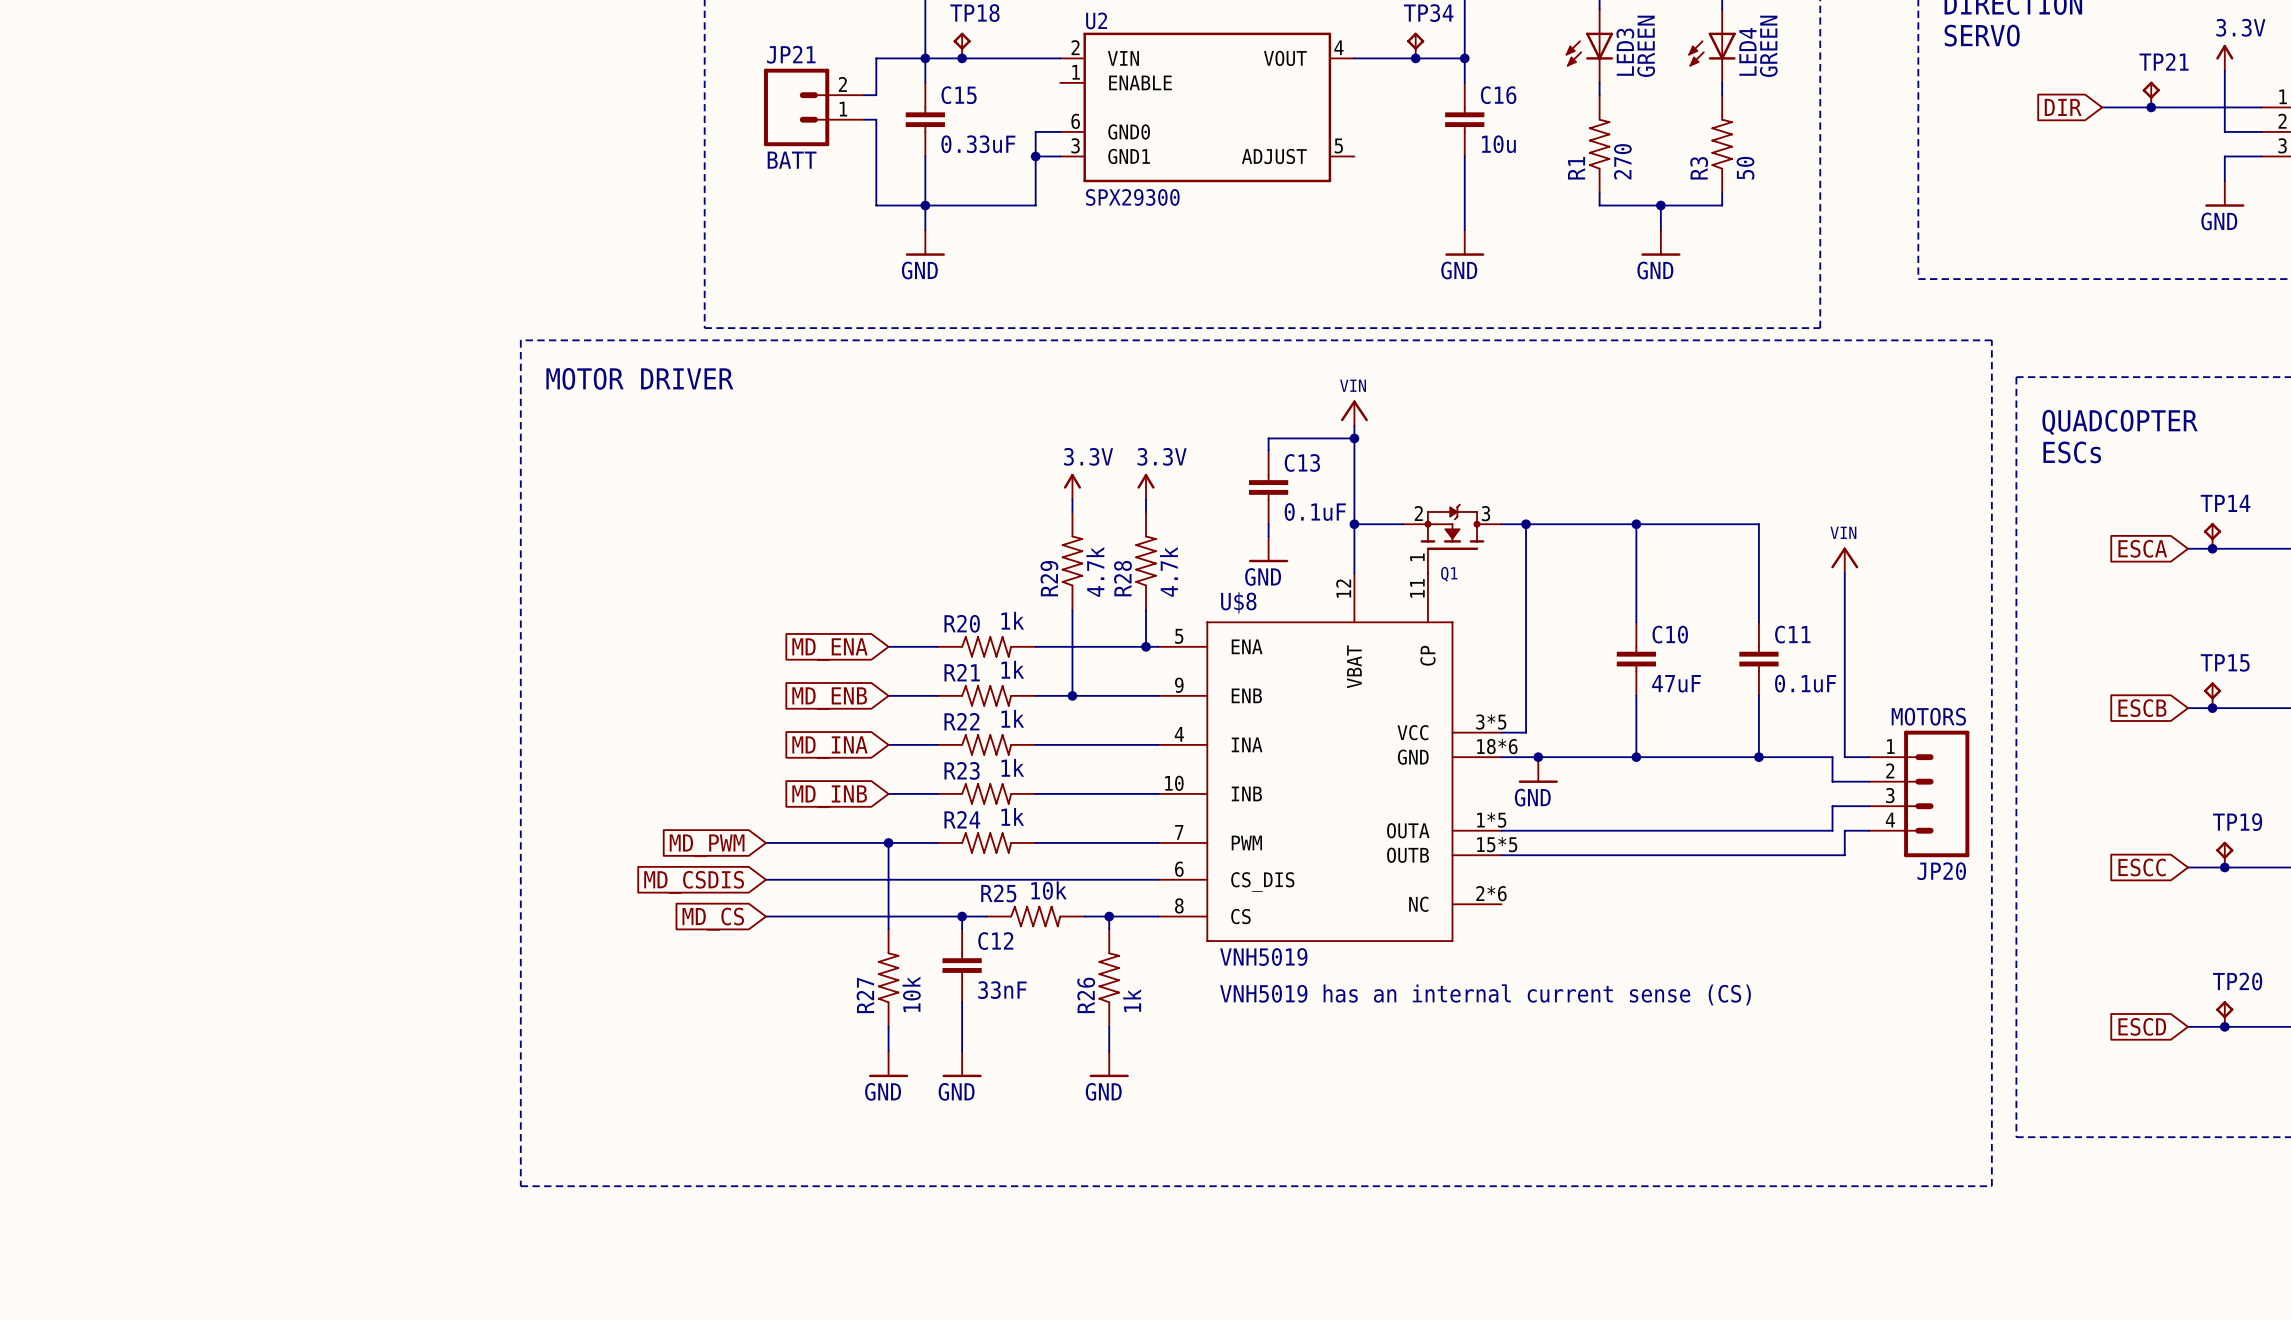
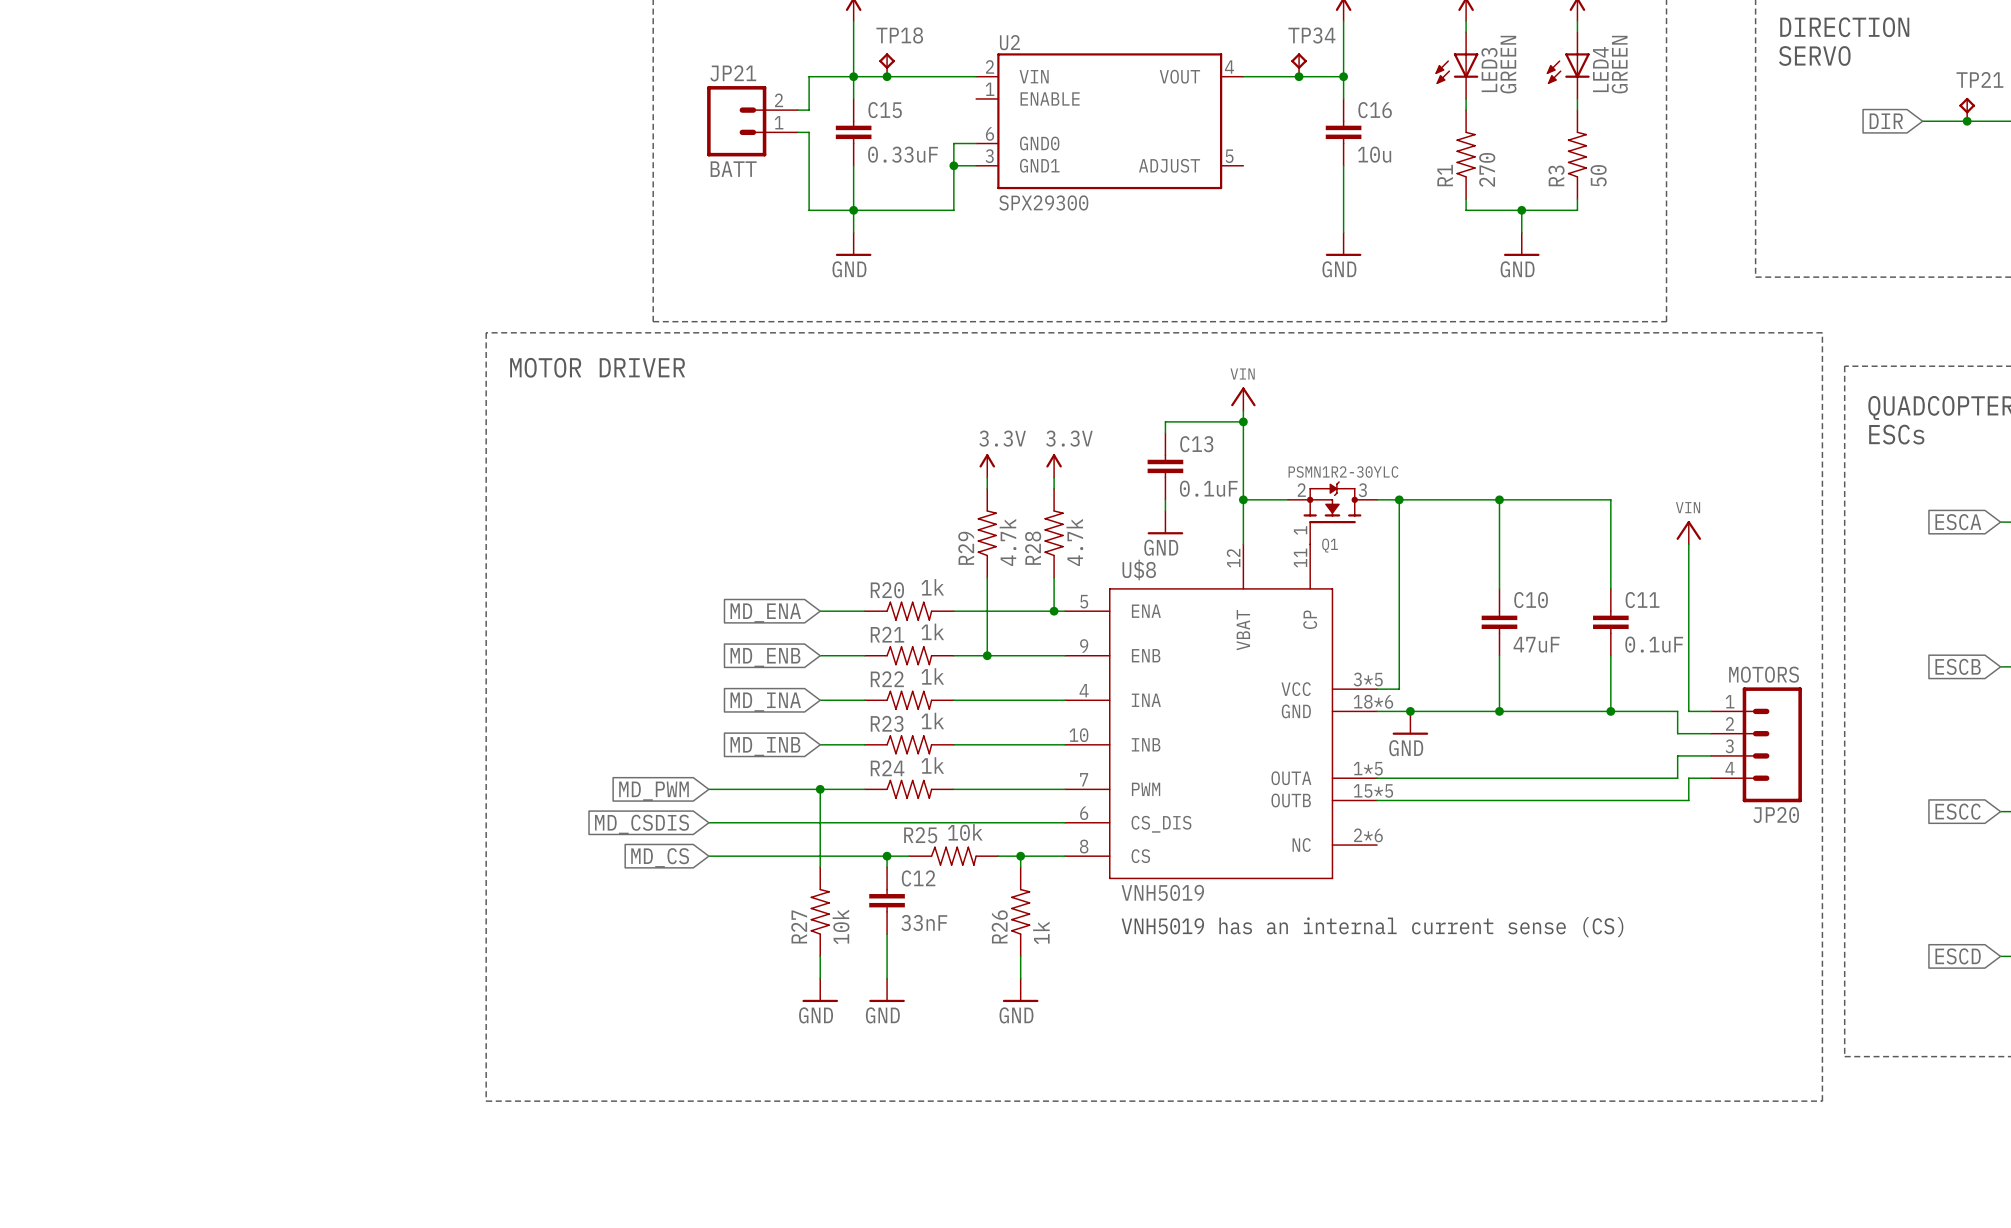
Q1 value: none -> PSMN1R2-30YLC (1343, 472)

